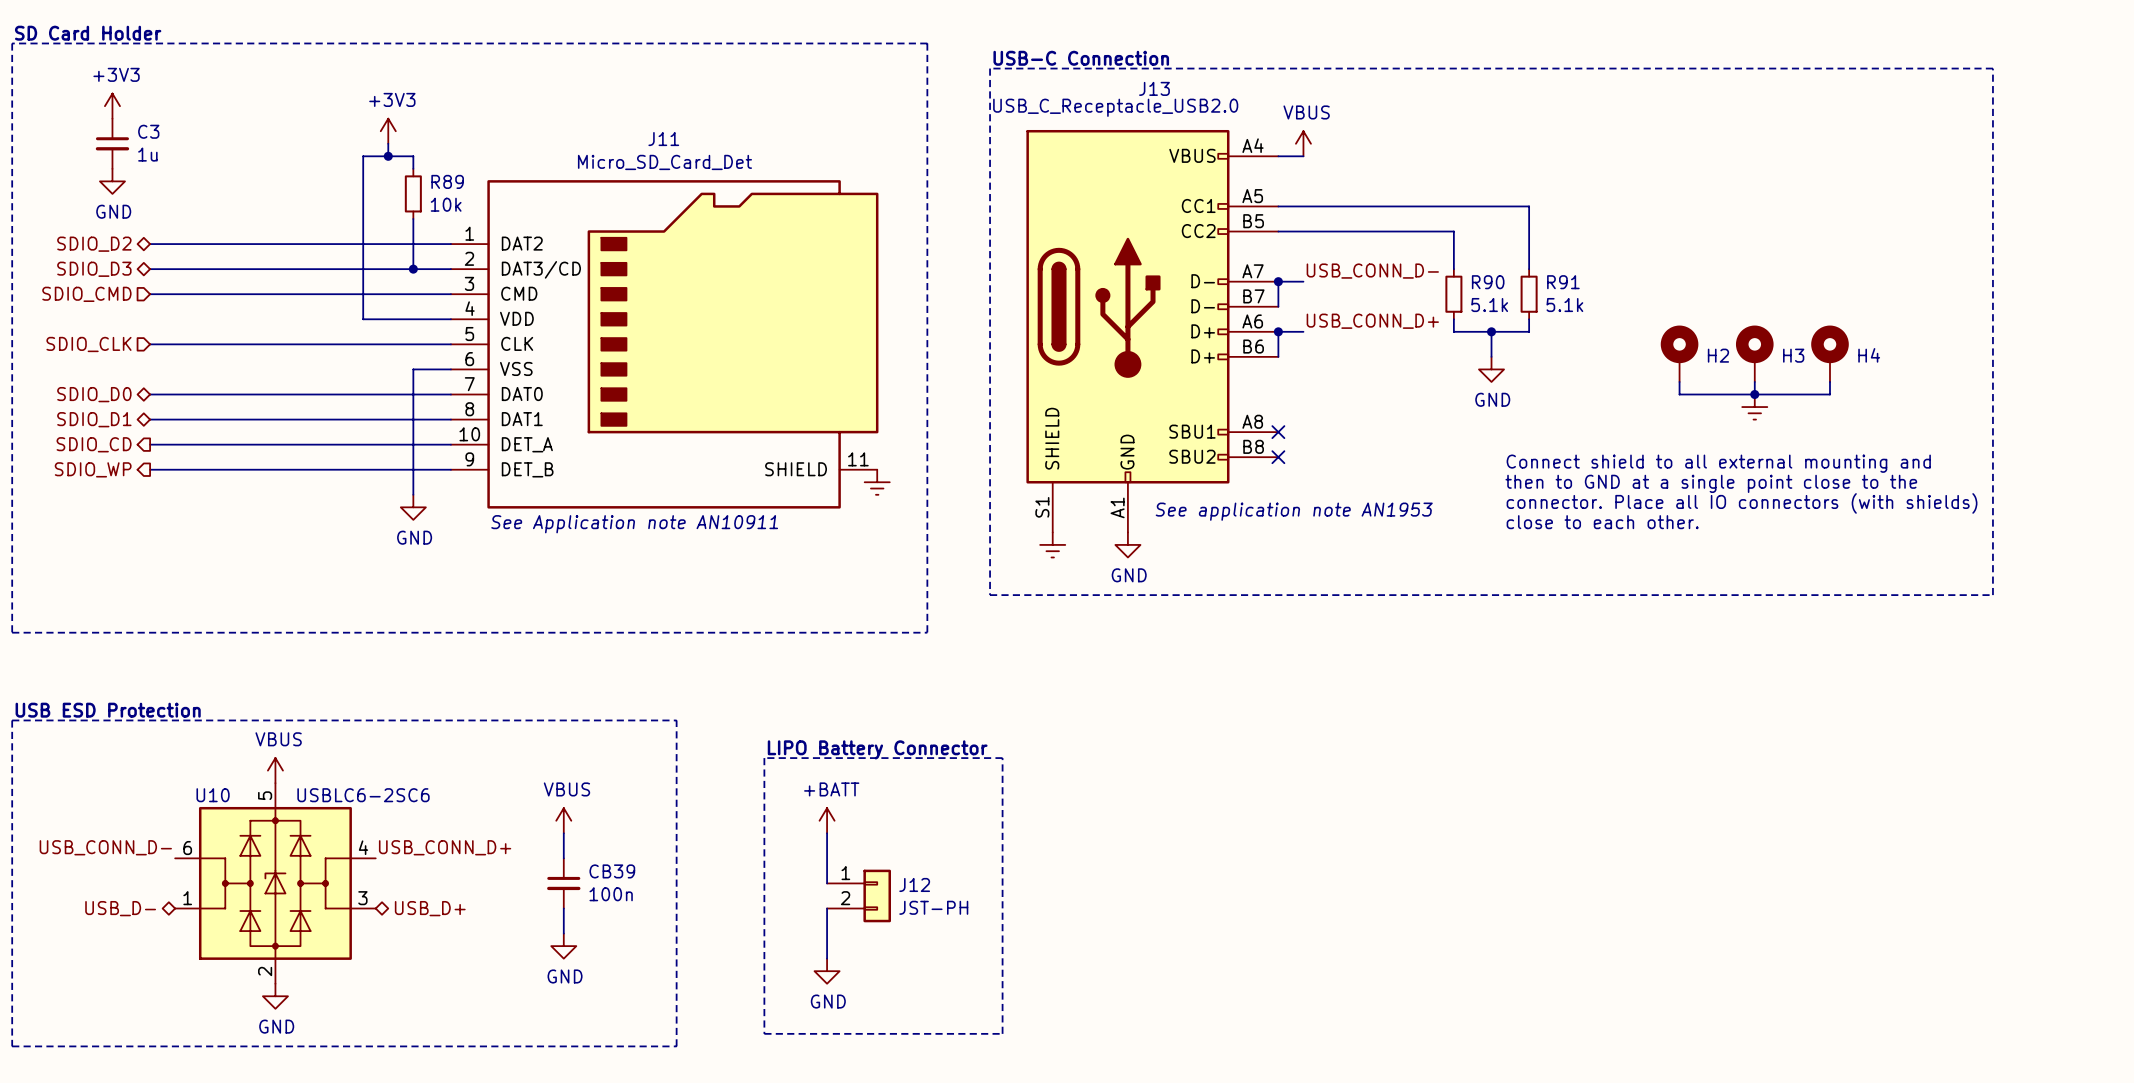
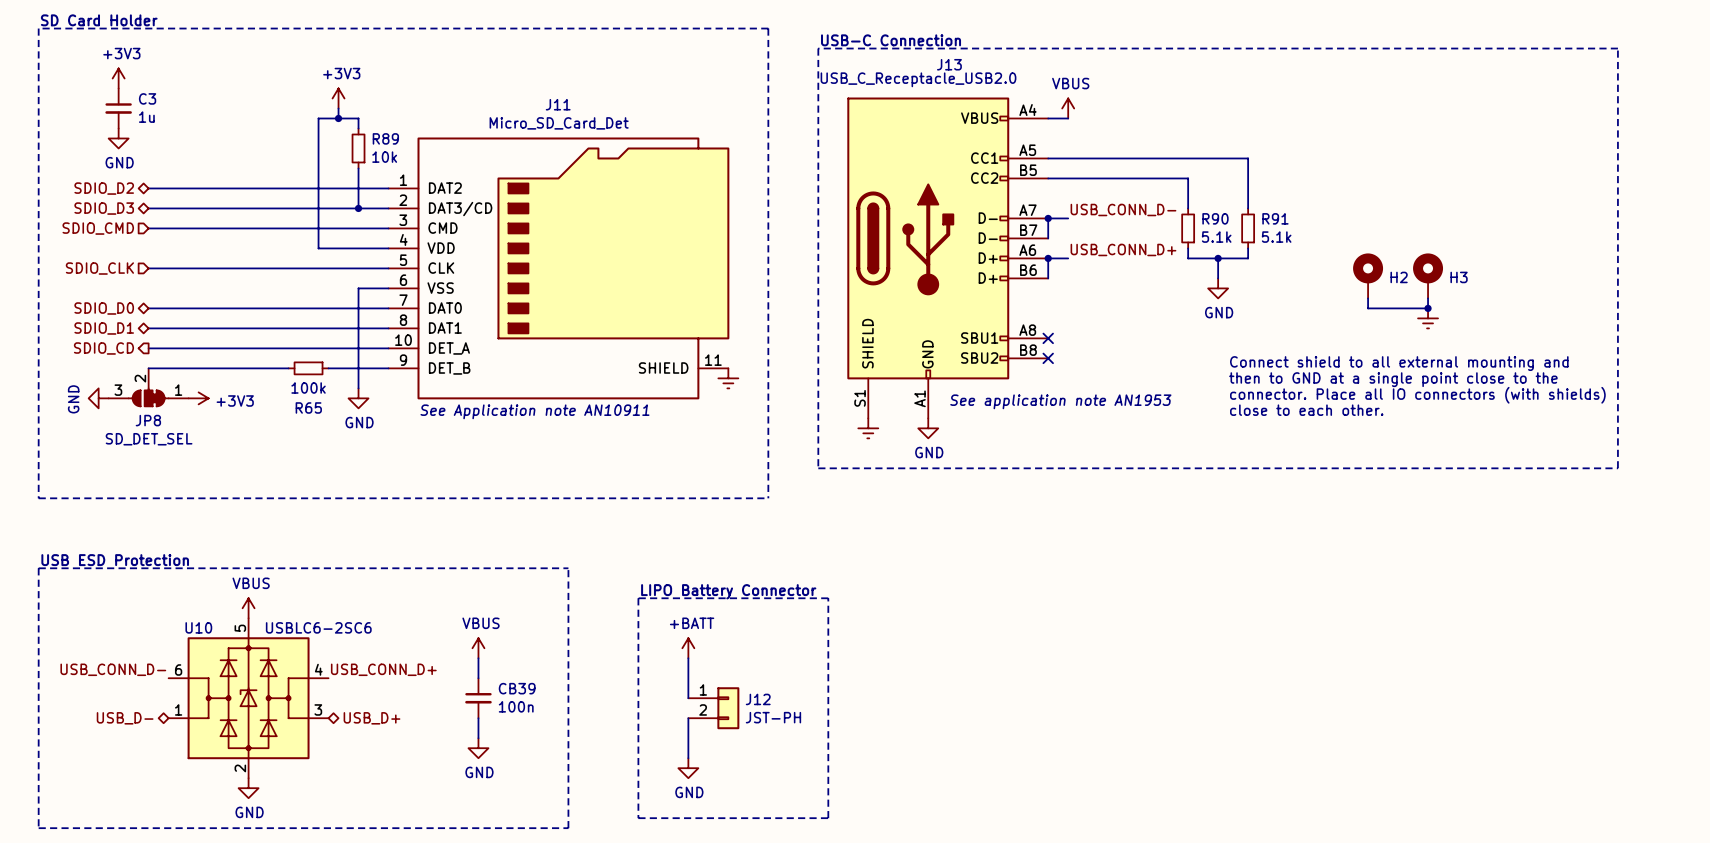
H4: (1829, 353) -> none
wire: (1829, 381) (1829, 394) (1754, 394) -> none
hierarchical label: SDIO_WP (93, 469) -> none
wire: (325, 469) (375, 469) -> none
R65: none -> 100k (308, 368)
JP8: none -> SD_DET_SEL (148, 387)
power symbol: none -> GND (98, 398)
power symbol: none -> +3V3 (198, 398)

